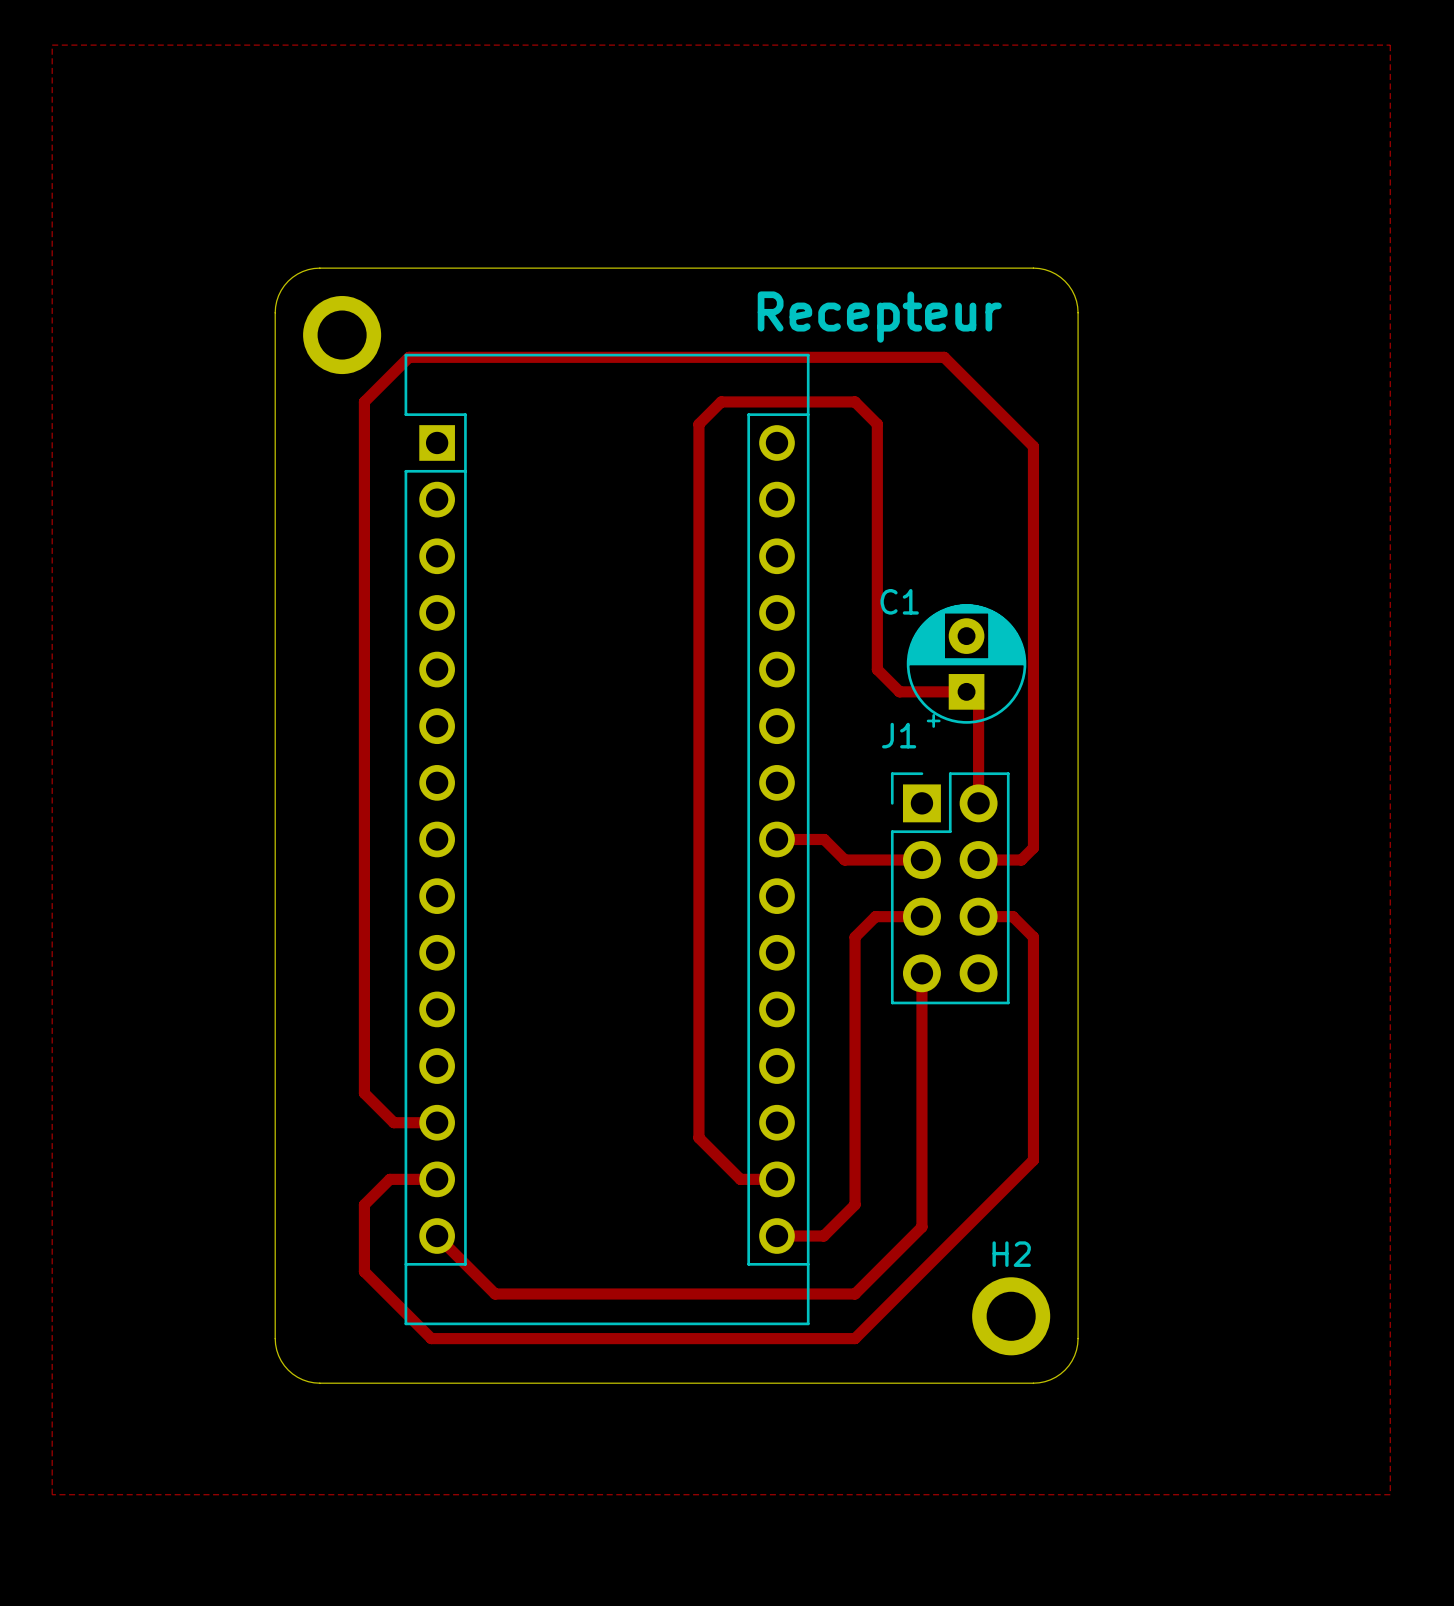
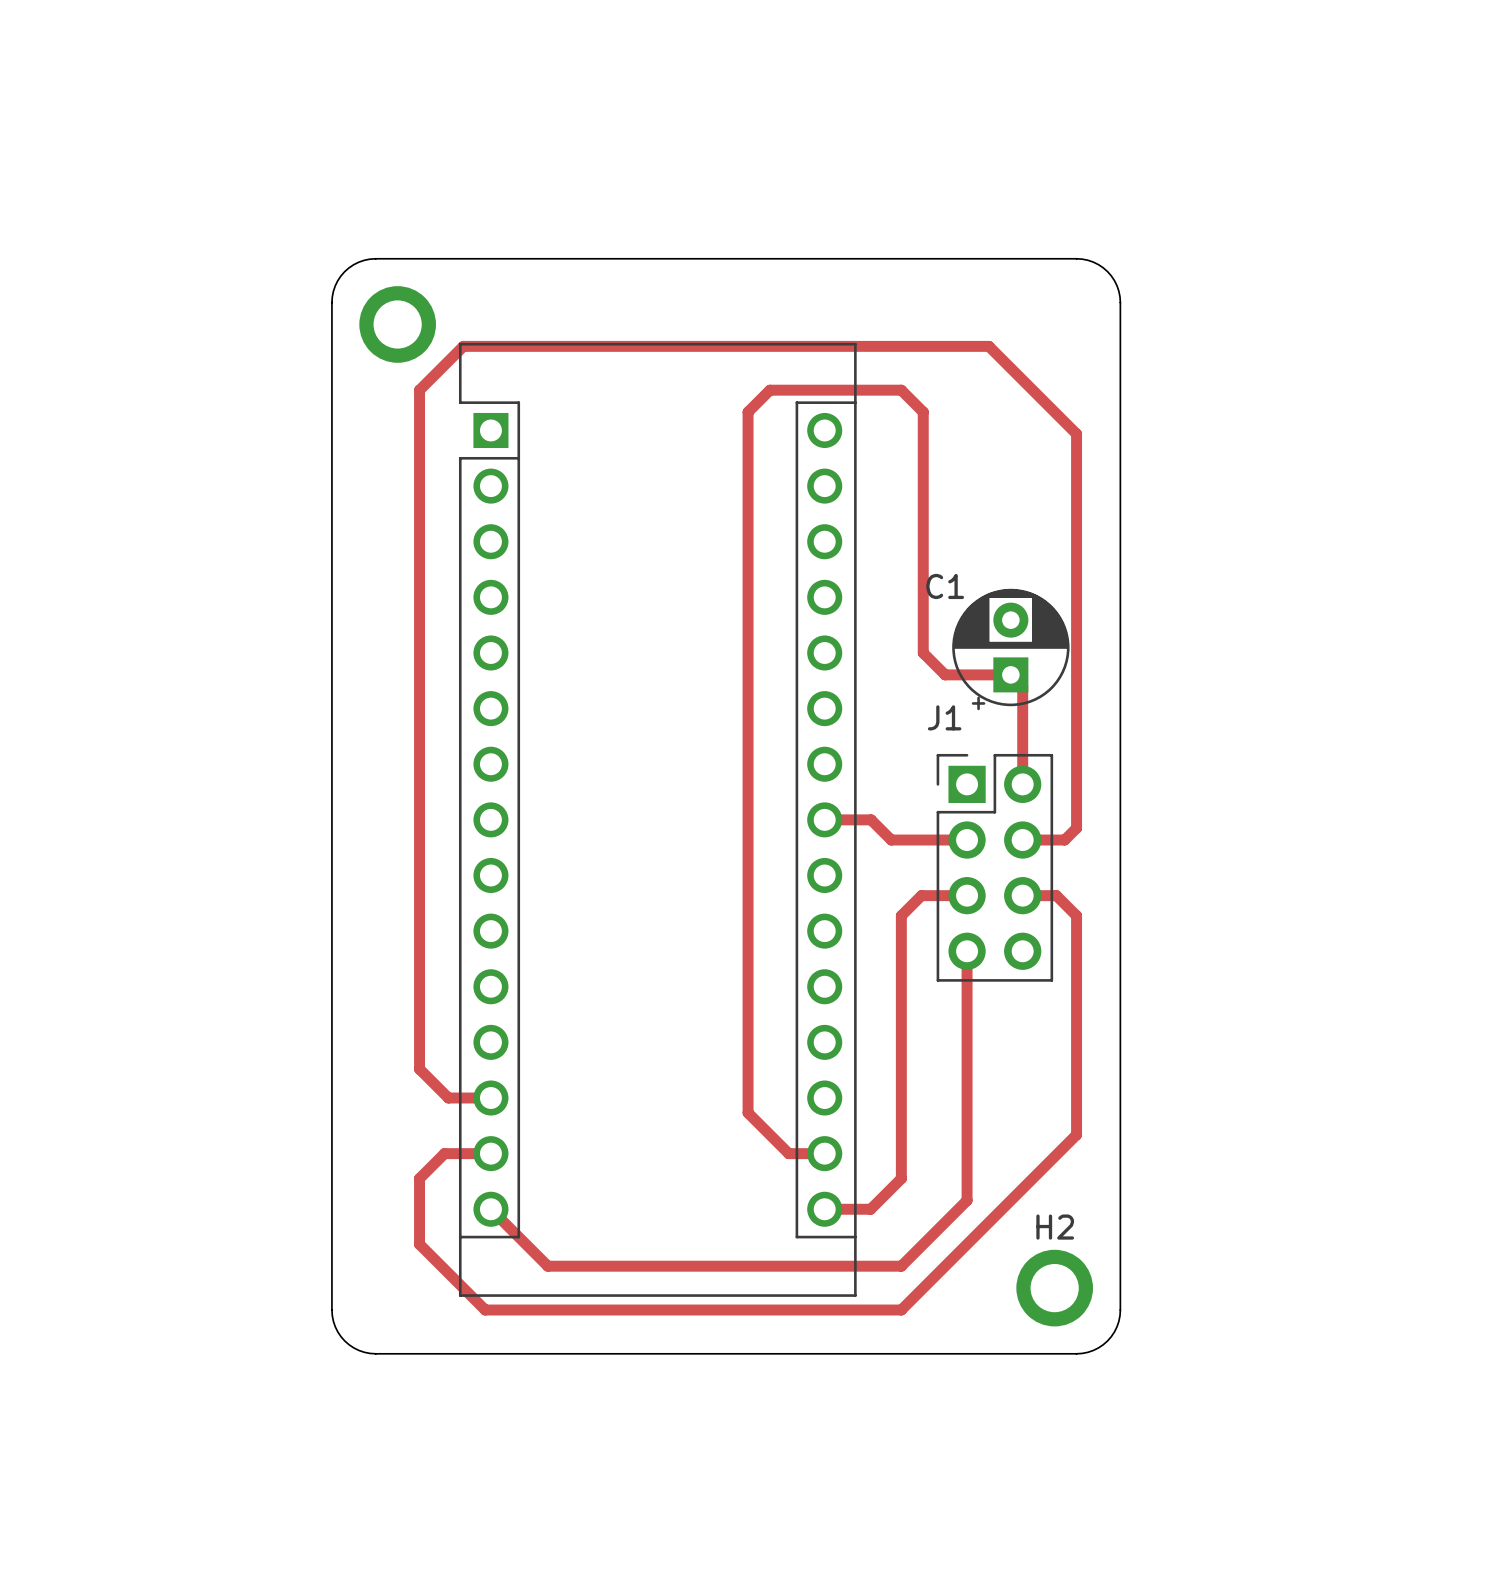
top zone outline: (52, 45) (52, 1494) (1390, 1494) (1390, 45) (52, 45) -> none
text: Recepteur (879, 317) -> none

